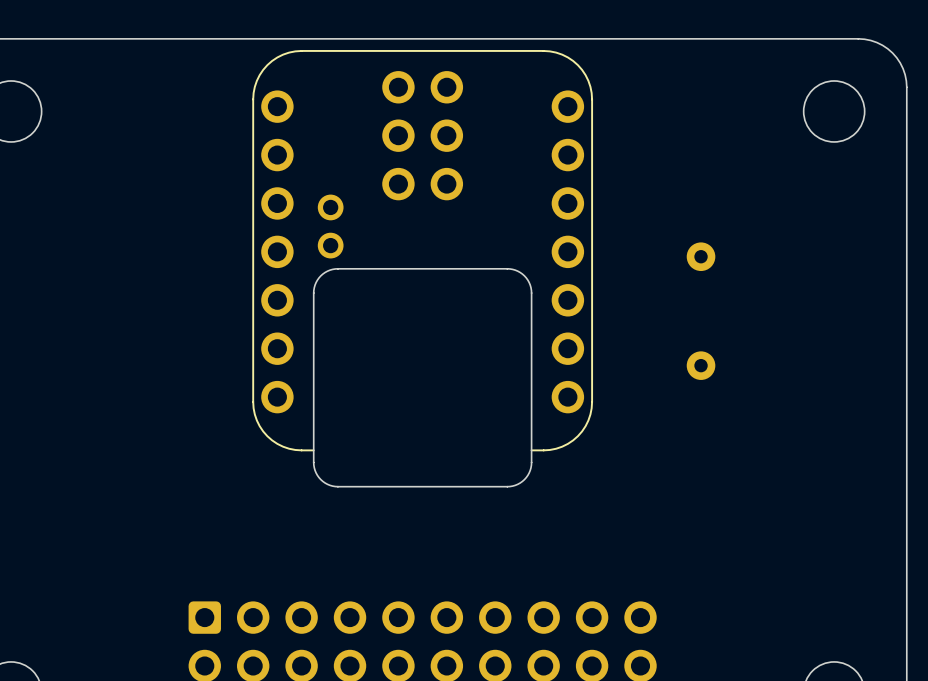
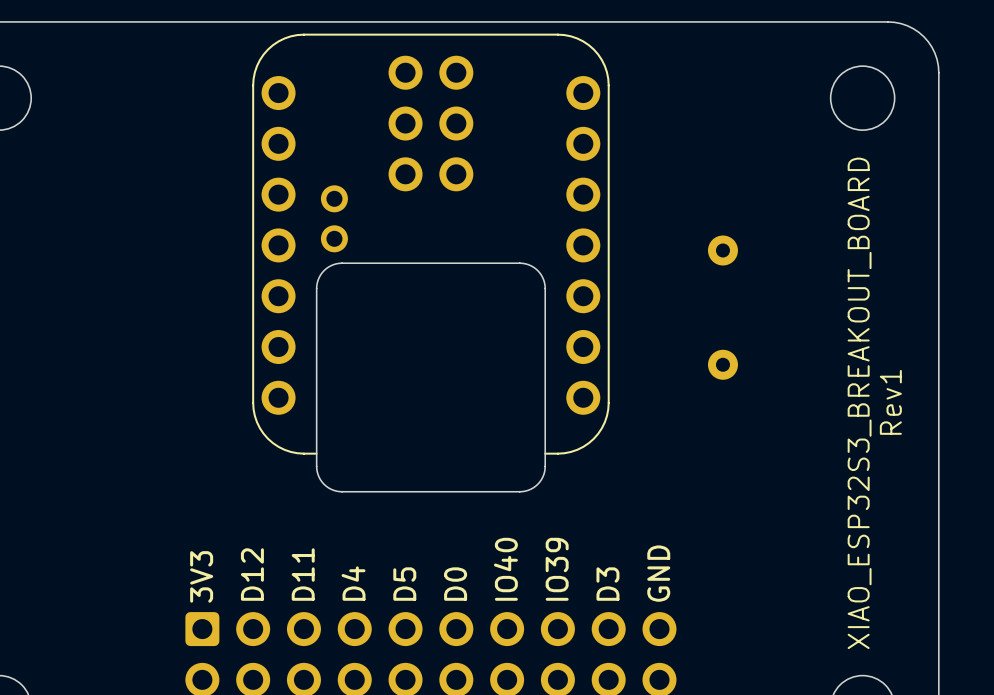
text: none -> Rev1 (890, 402)
text: none -> XIAO_ESP32S3_BREAKOUT_BOARD (859, 403)
text: none -> IO40 (505, 569)
text: none -> IO39 (557, 569)
text: none -> GND (658, 573)
text: none -> D12 (252, 574)
text: none -> D11 (303, 574)
text: none -> 3V3 (201, 576)
text: none -> D4 (353, 583)
text: none -> D5 (404, 584)
text: none -> D0 (455, 584)
text: none -> D3 (607, 584)

